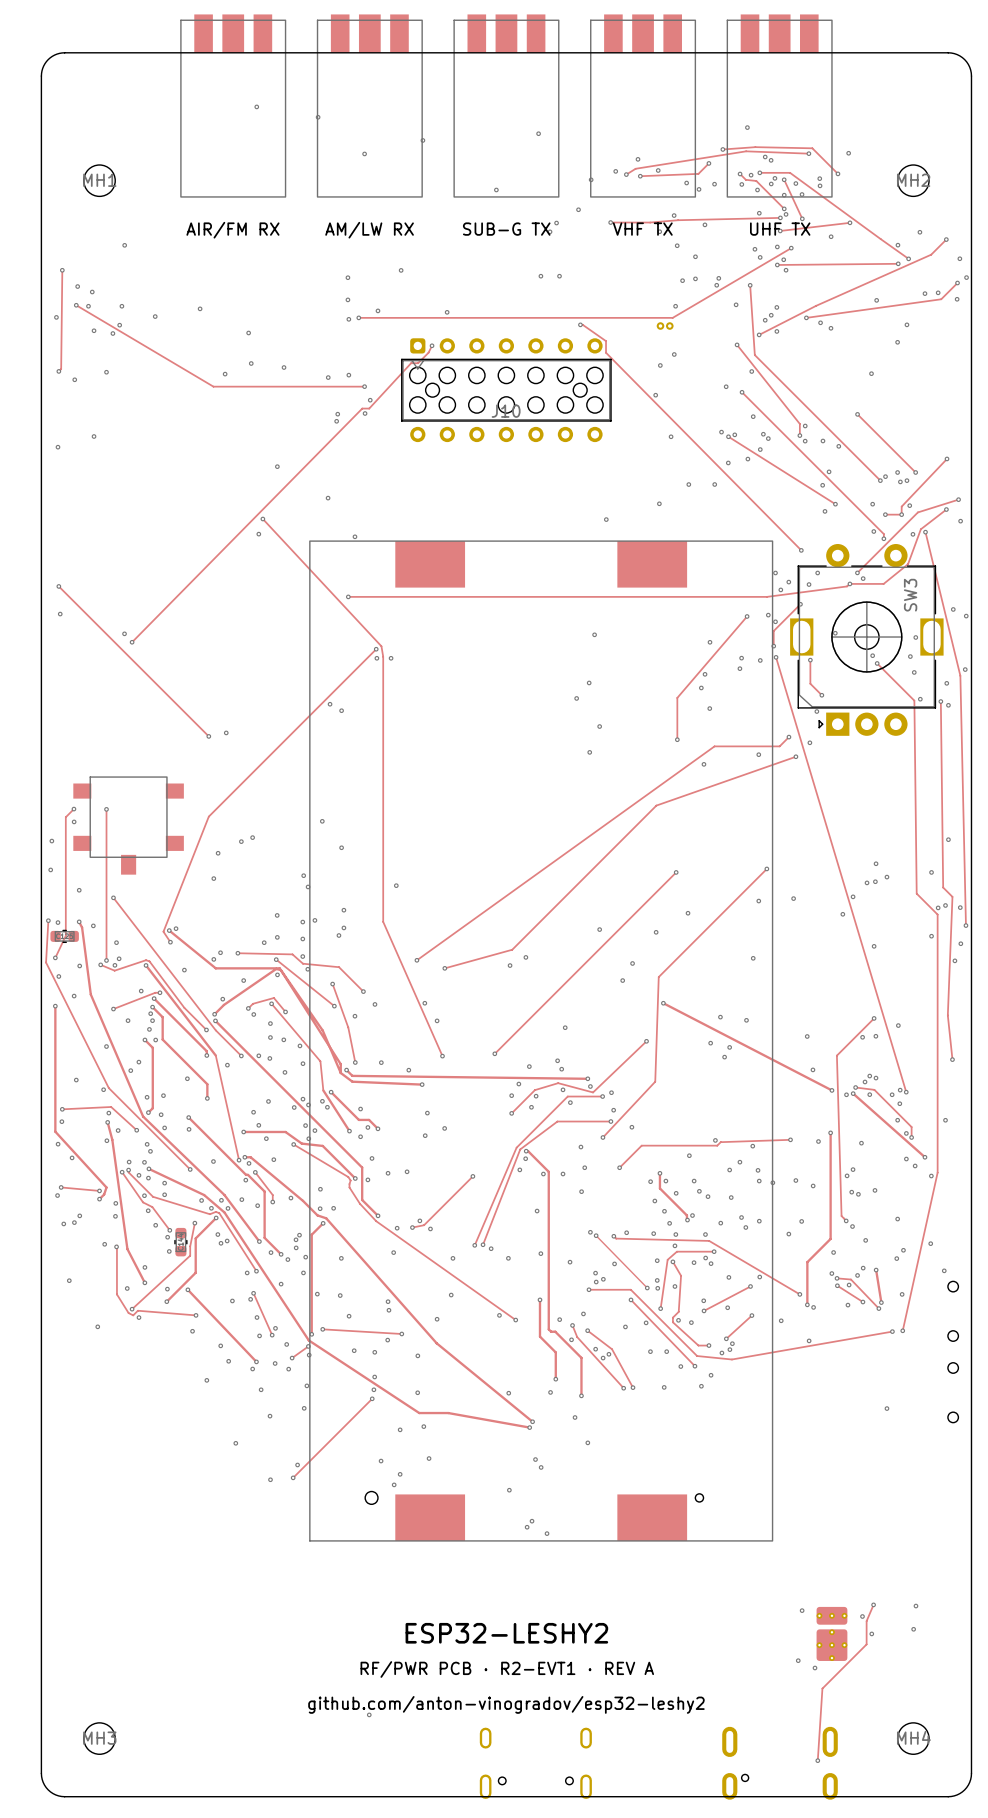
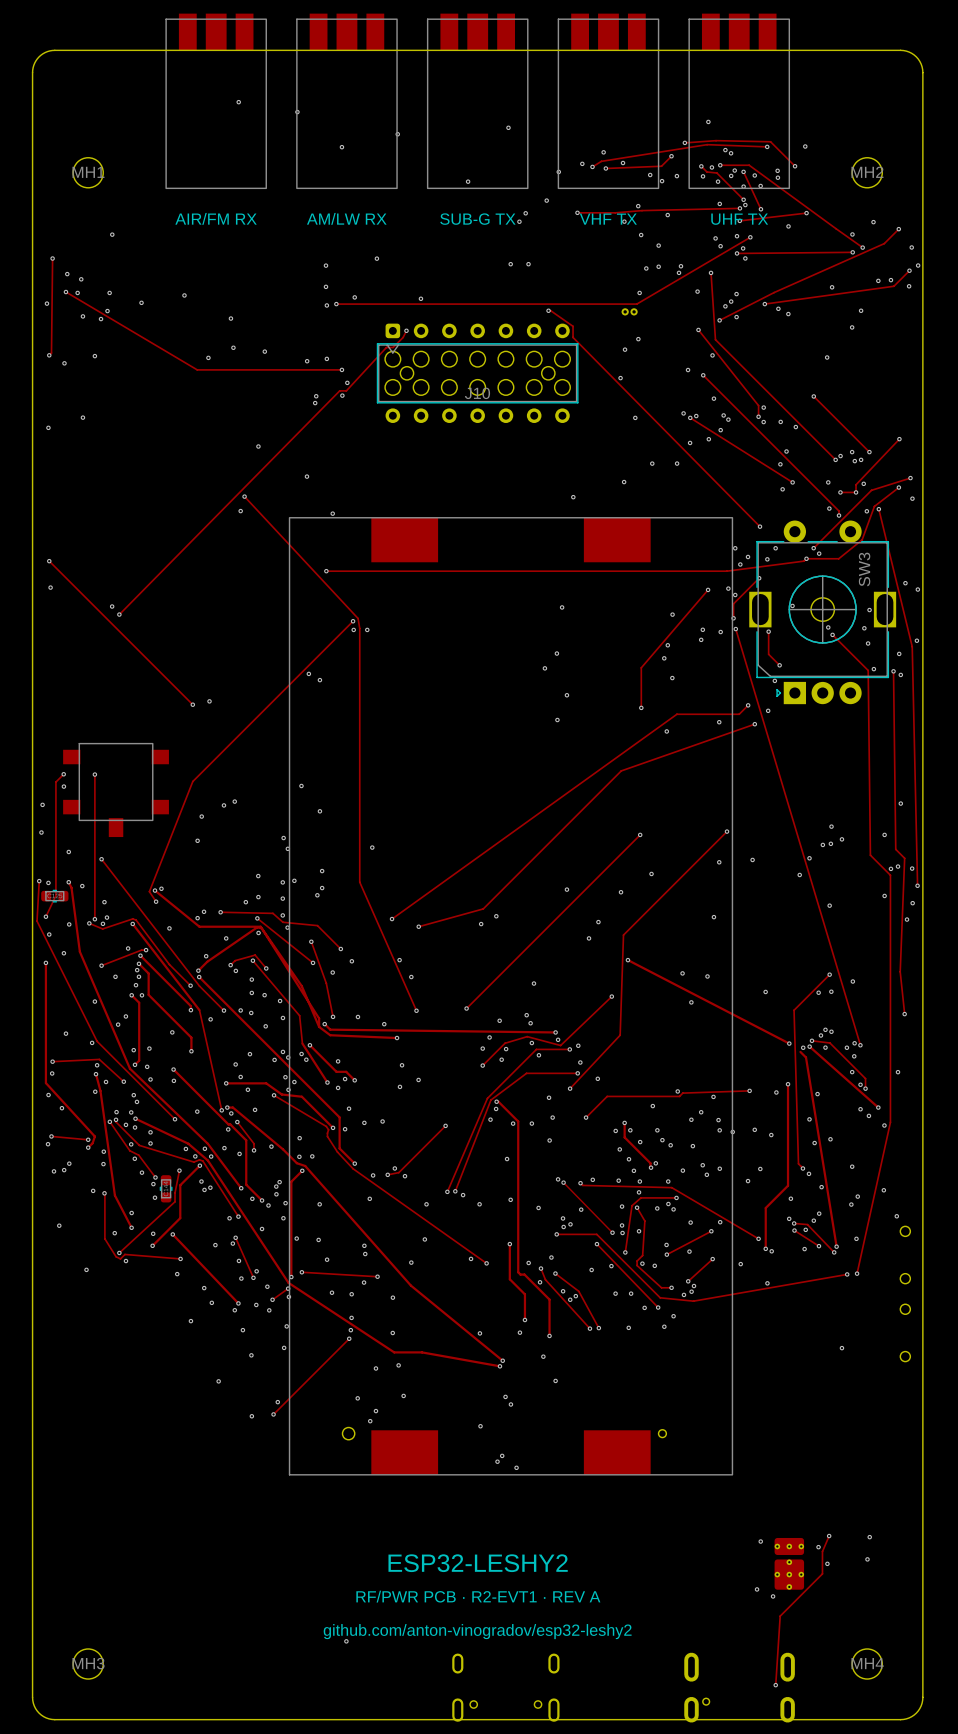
via: (710, 1043) -> none
via: (724, 1057) -> none
via: (812, 1069) -> none
via: (847, 1175) -> none
via: (851, 1192) -> none
track: (876, 1270) (881, 1302) -> (800, 1051) (806, 1057) (836, 1246)
via: (876, 1270) -> none

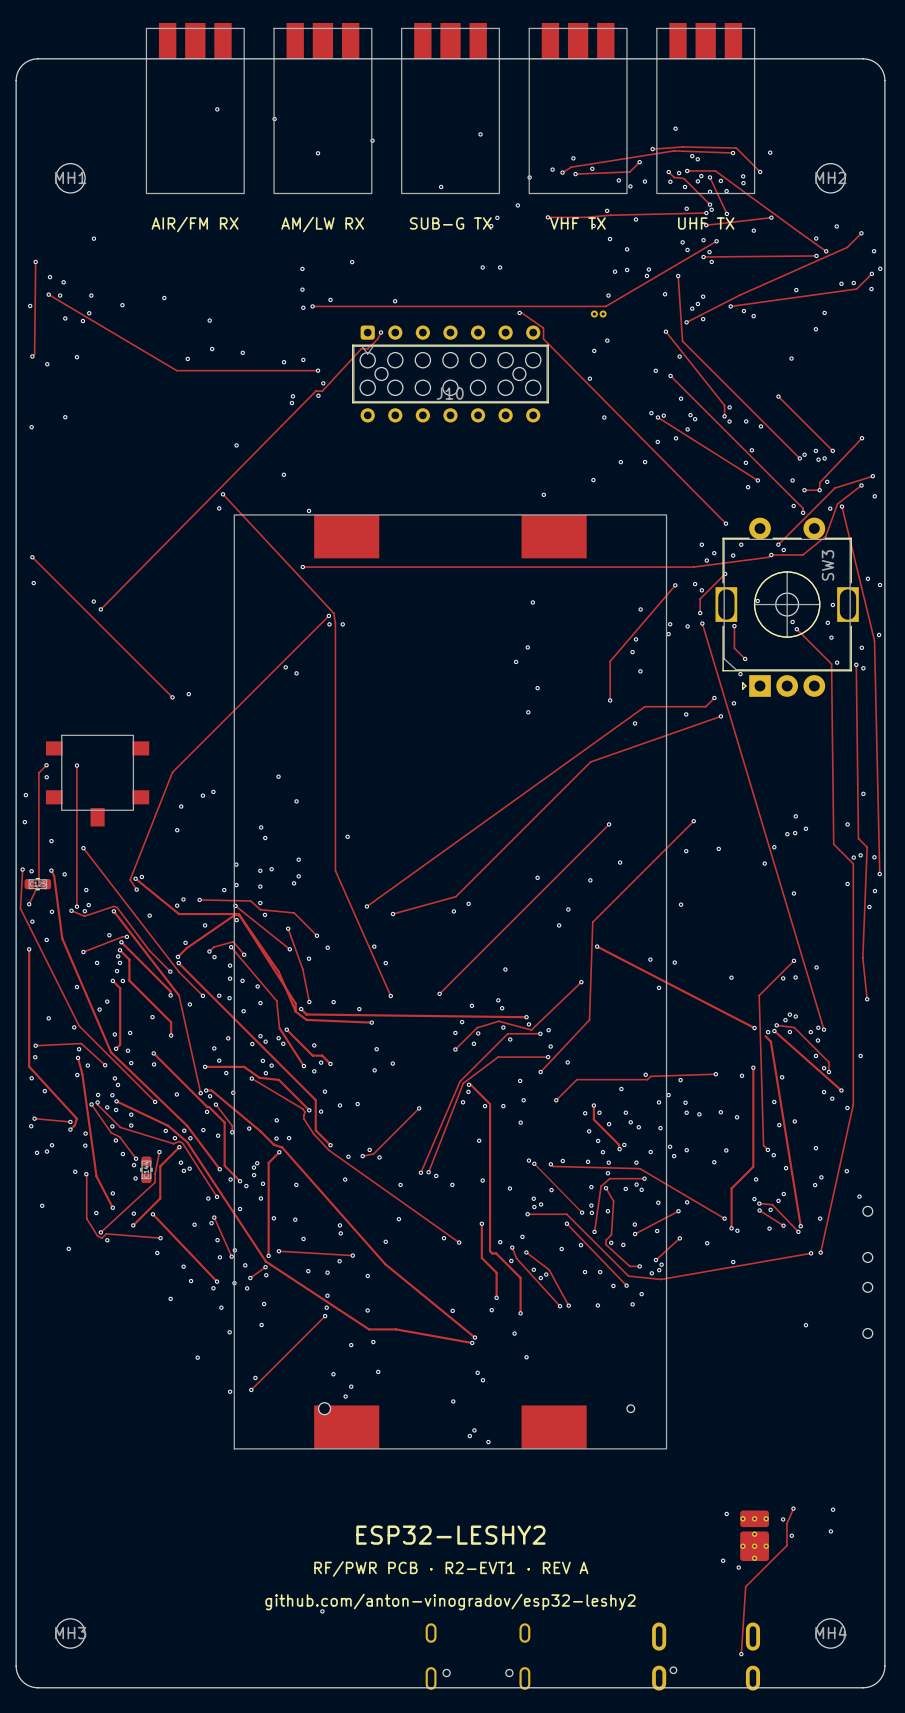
part position: (510, 996) -> (450, 981)

